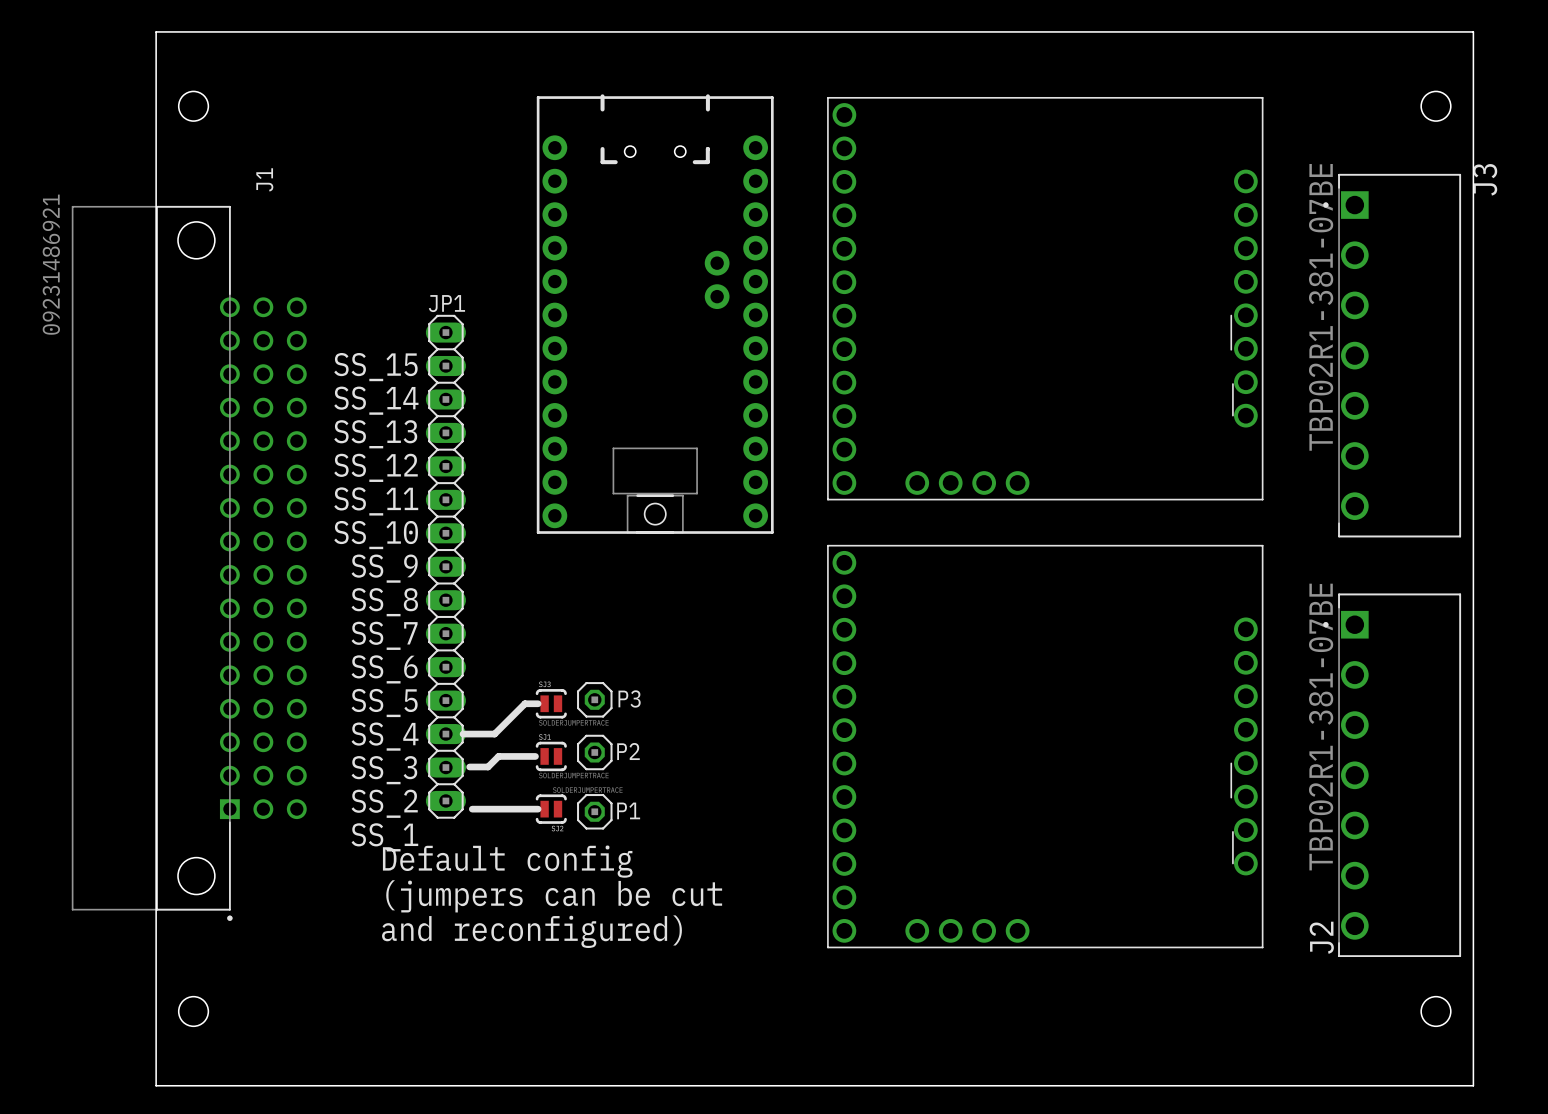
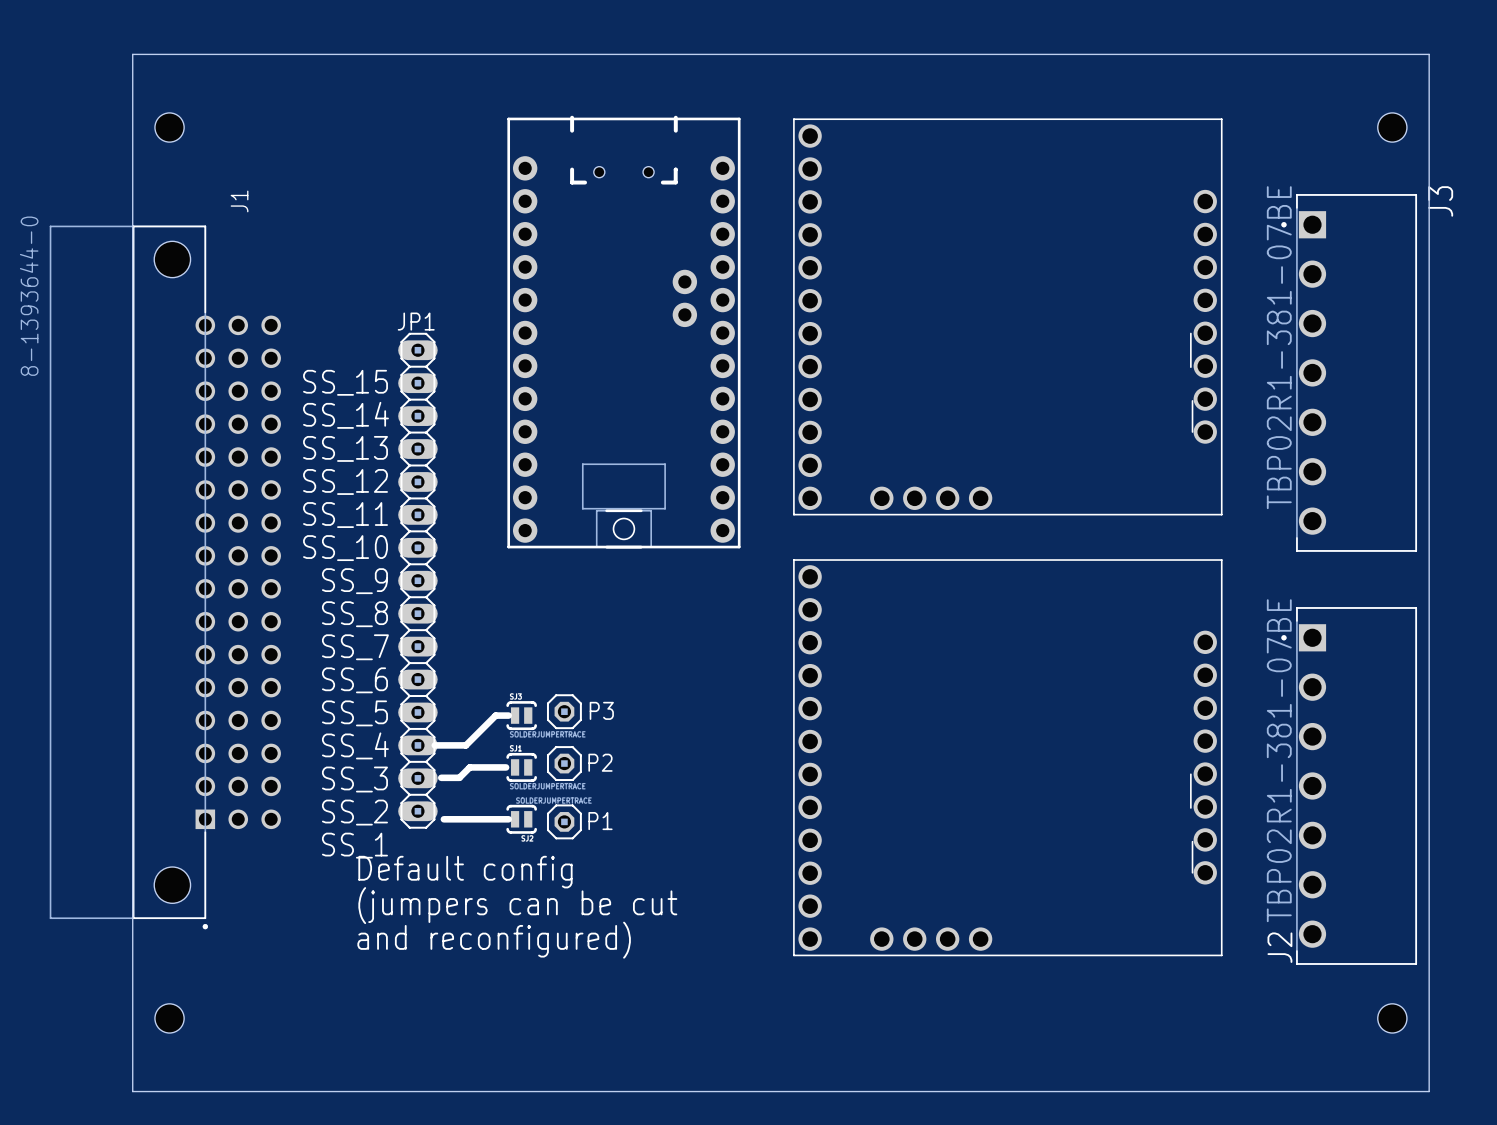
J1 value: 09231486921 (51, 264) -> 8-1393644-0 (29, 296)

